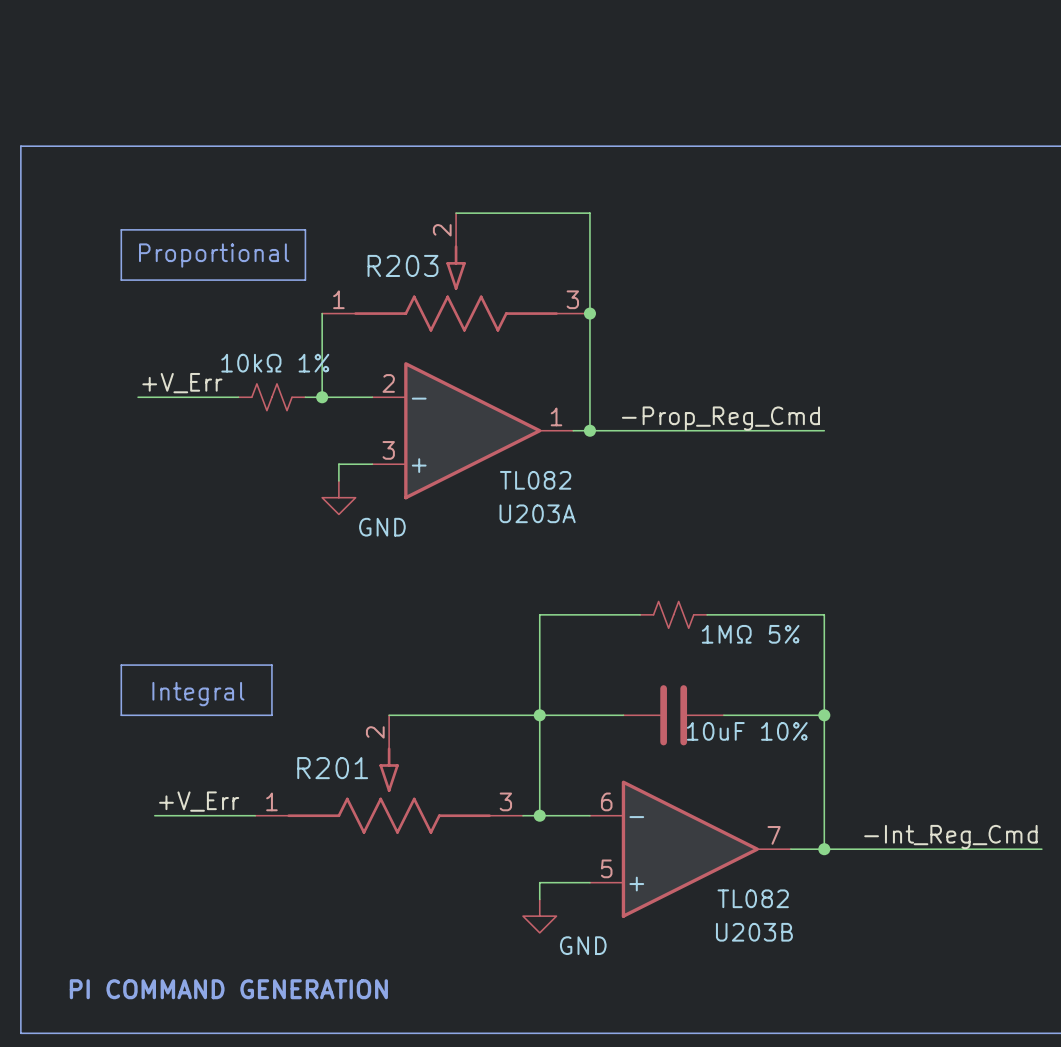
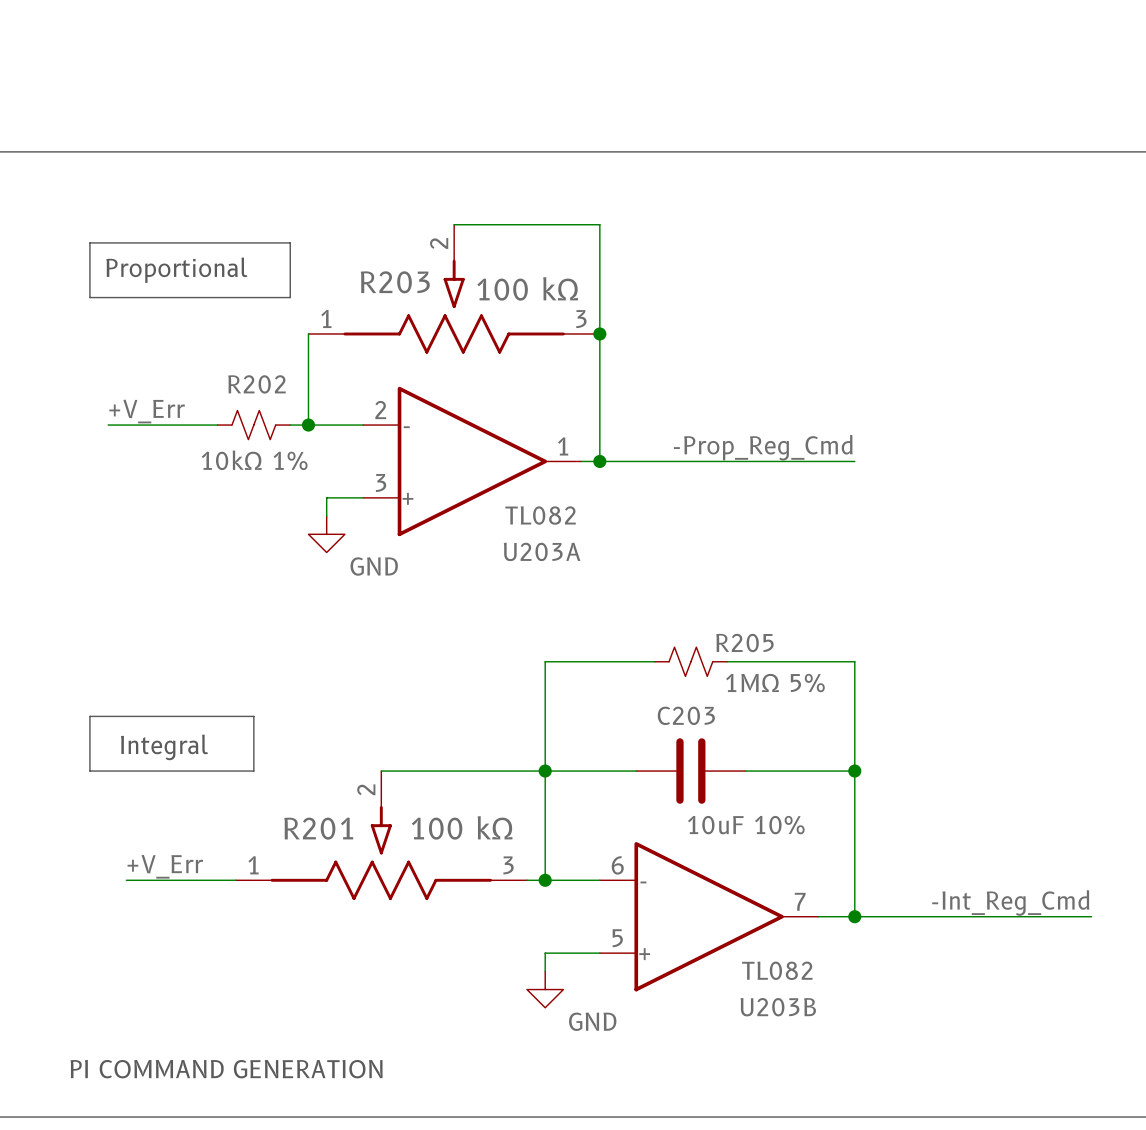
R203 value: none -> 100 kΩ (527, 288)
R202 name: none -> R202 (256, 384)
R202 value position: 10kΩ 1% (275, 363) -> 10kΩ 1% (254, 460)
R205 name: none -> R205 (744, 643)
C203 name: none -> C203 (686, 715)
C203 value position: 10uF 10% (747, 731) -> 10uF 10% (746, 825)
R201 value: none -> 100 kΩ (462, 827)

